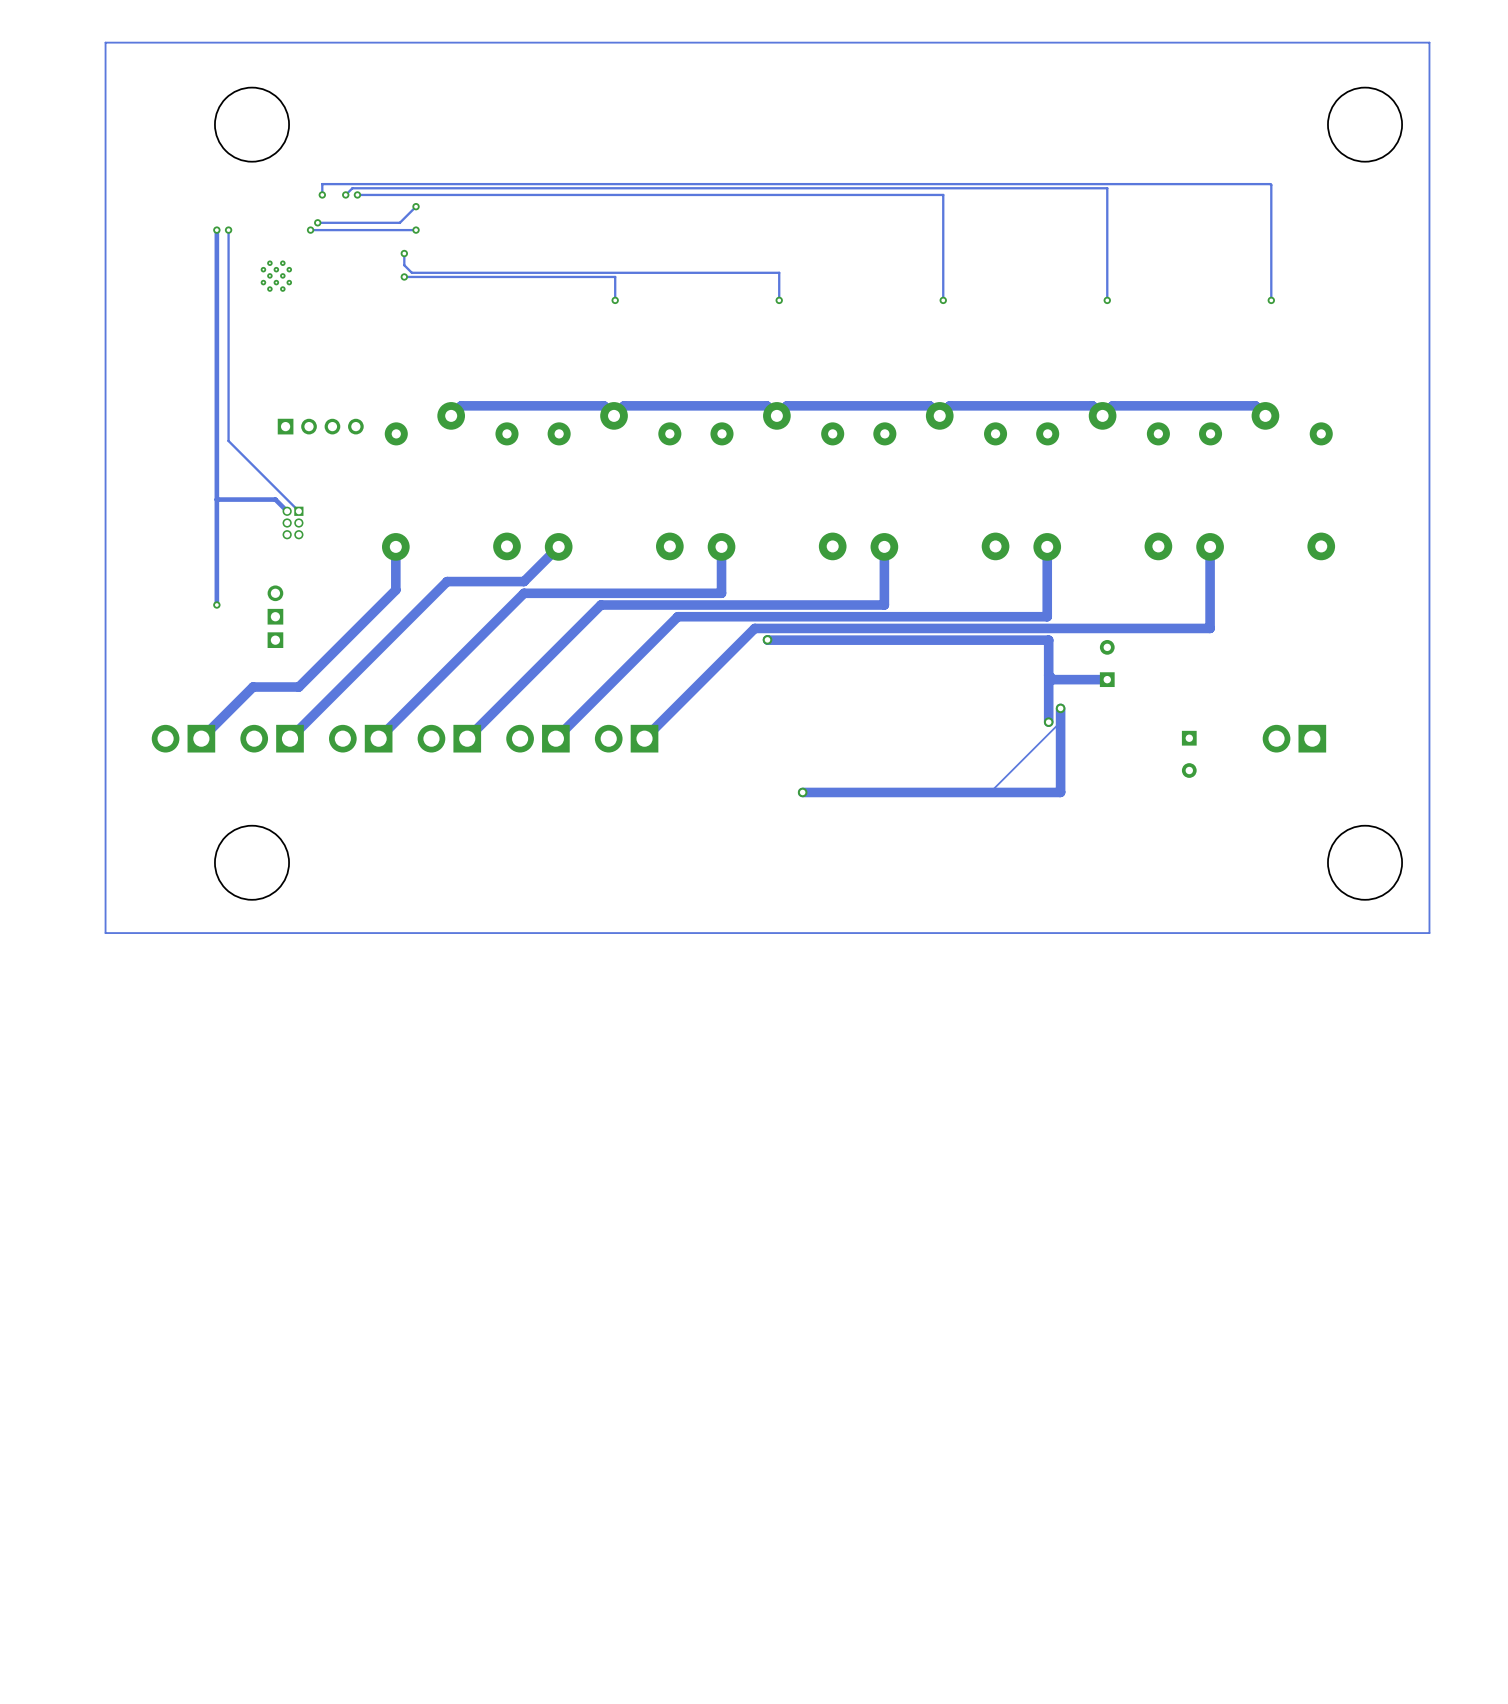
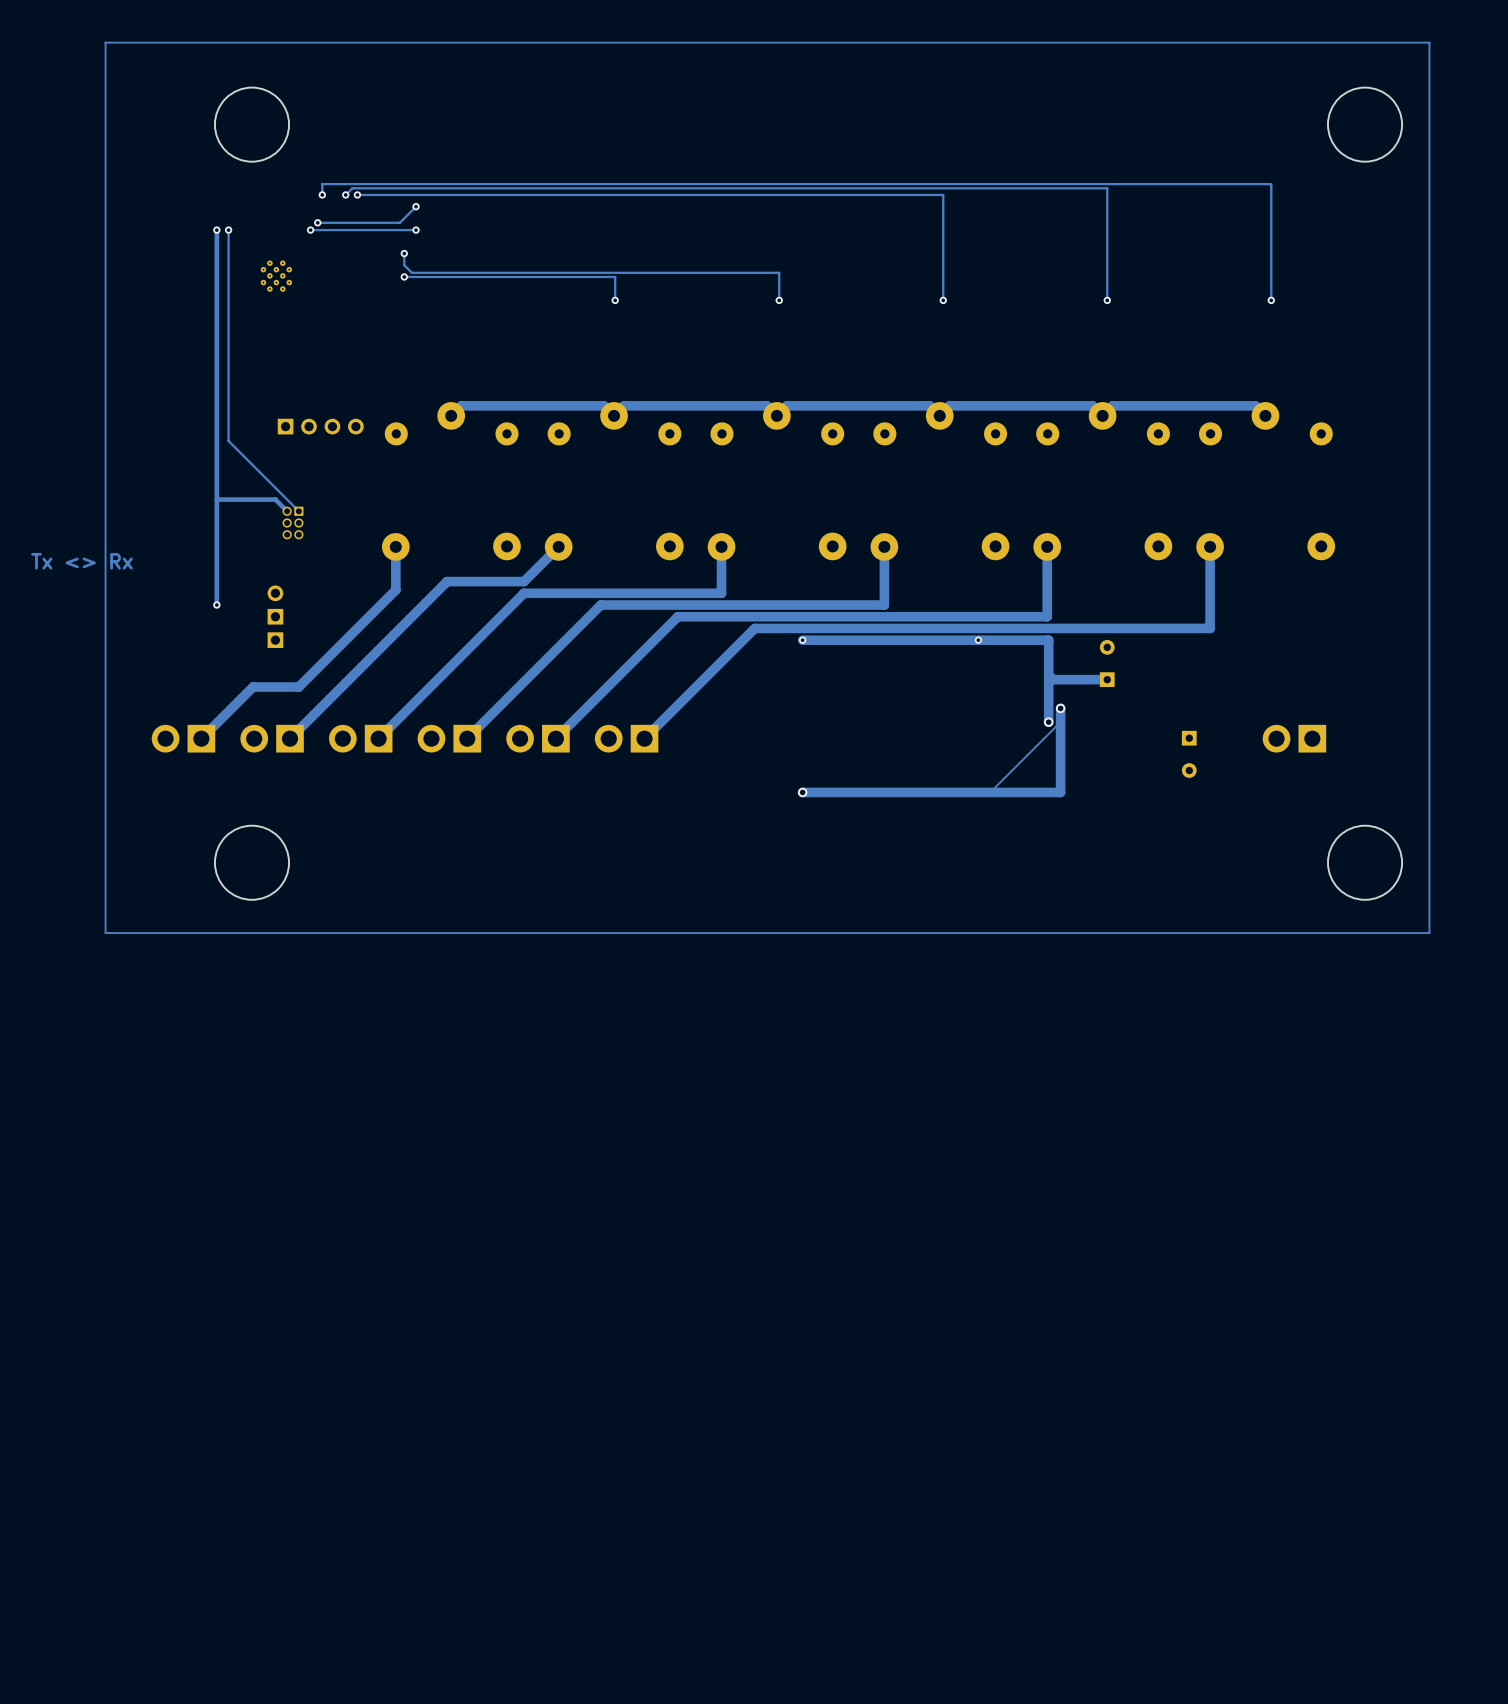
text: none -> Tx <> Rx (81, 561)
track: (767, 639) (802, 640) -> none
via: (767, 639) -> none
via: none -> (802, 640)
via: none -> (978, 640)

